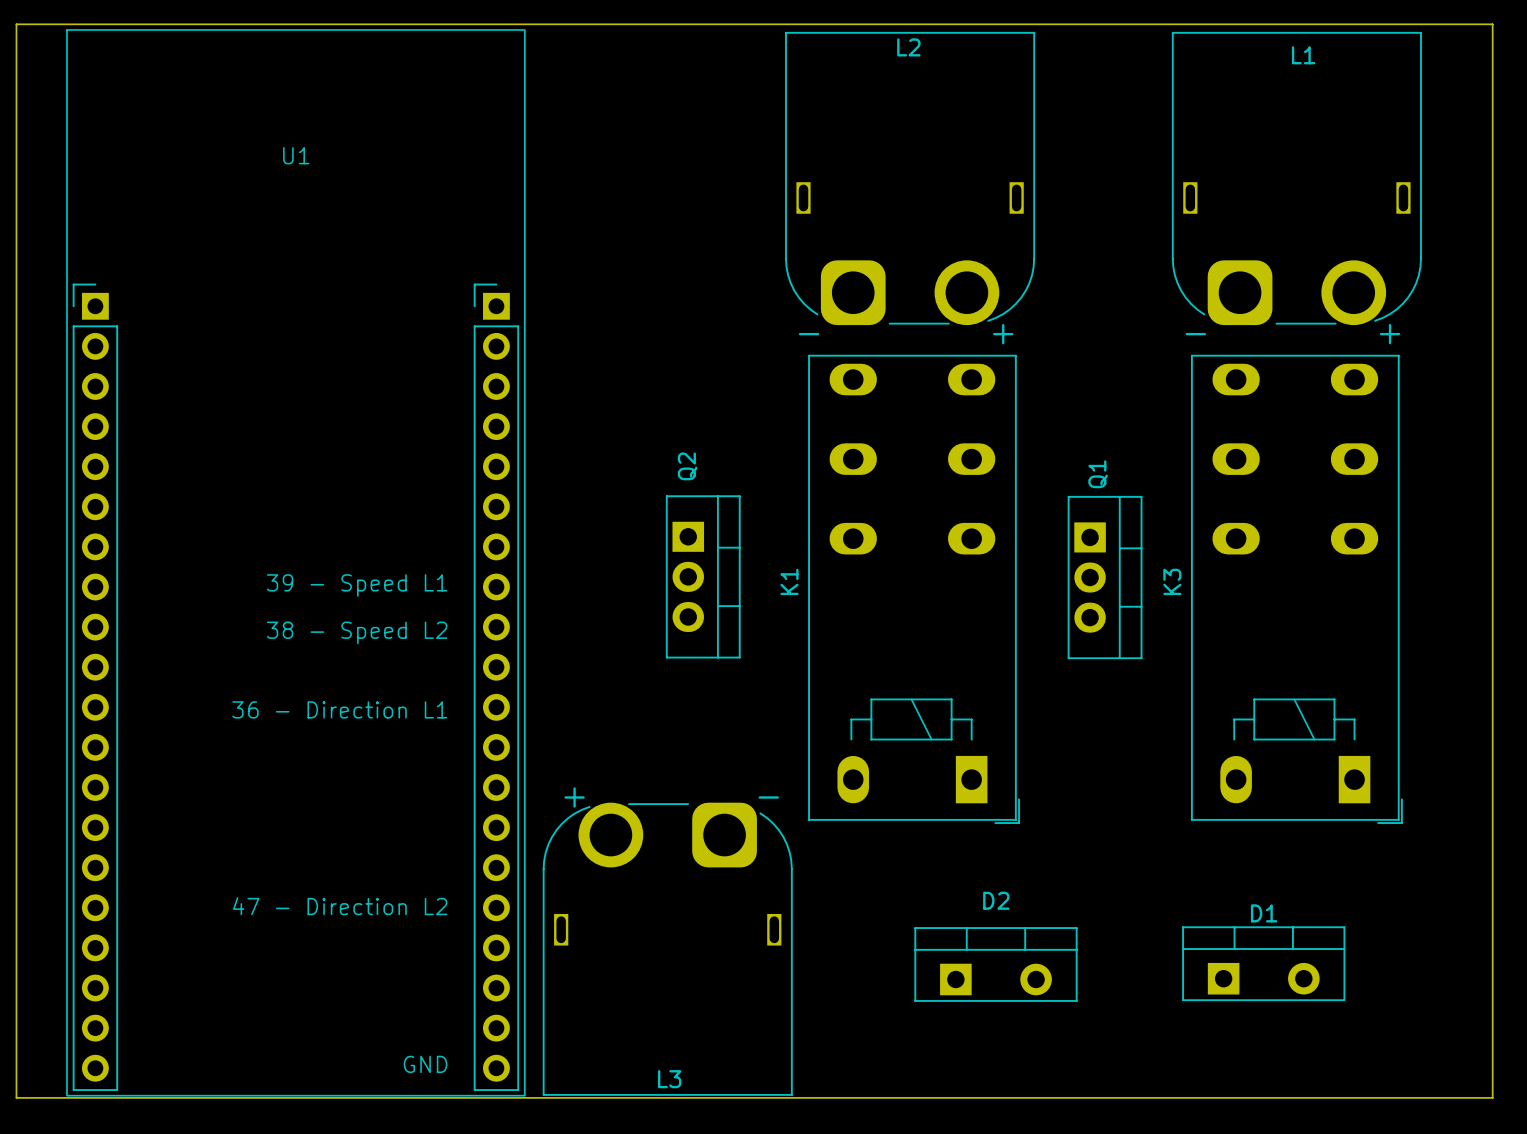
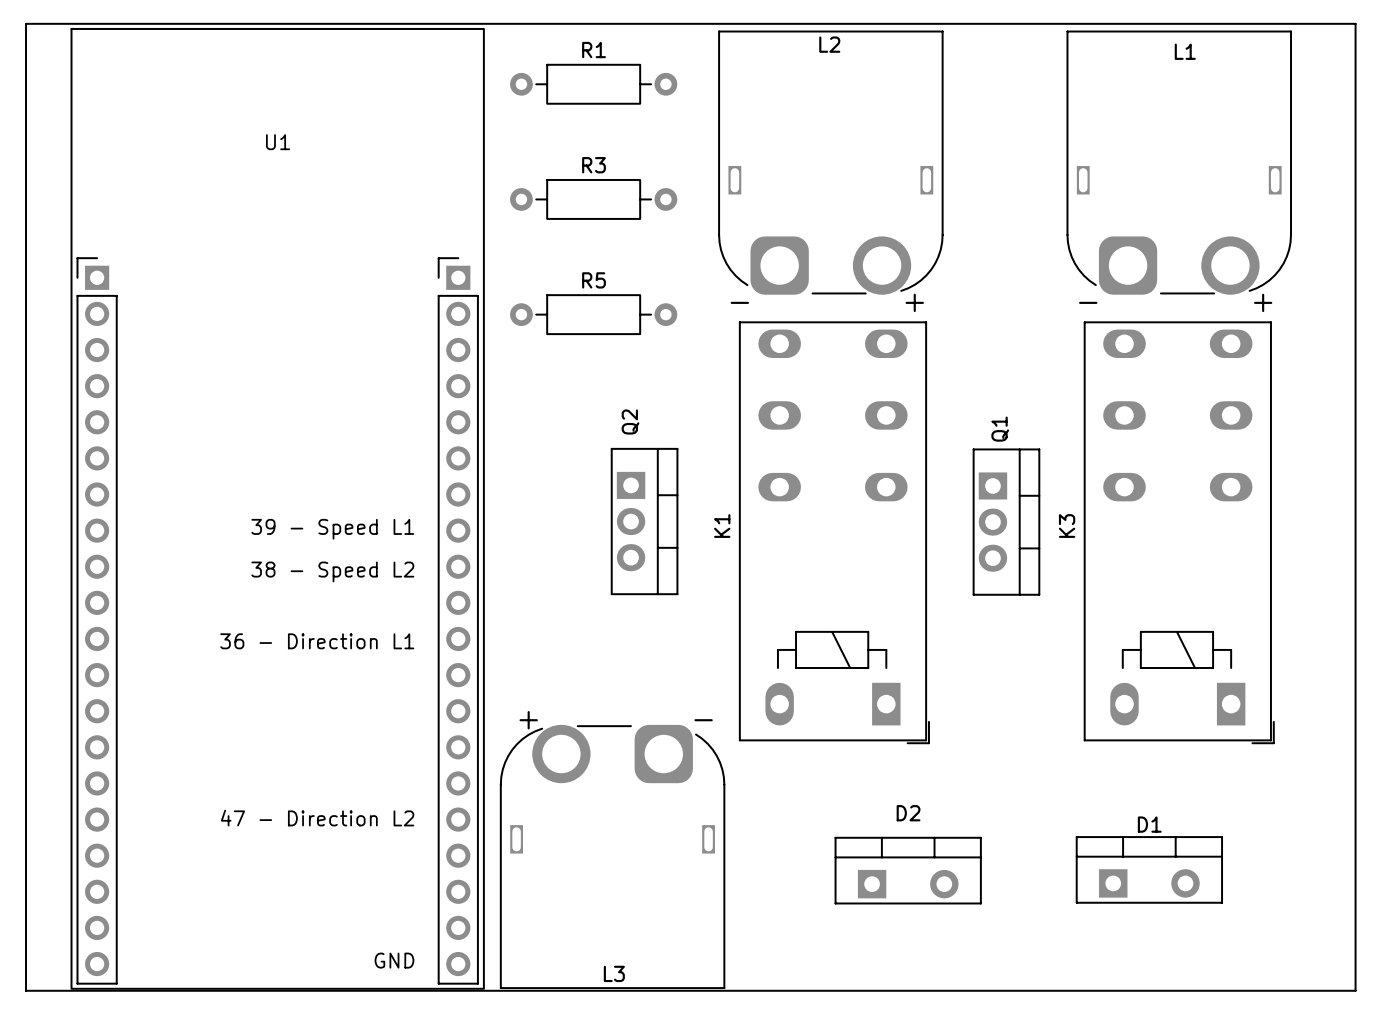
R1: none -> (593, 84)
R3: none -> (593, 199)
R5: none -> (593, 314)

